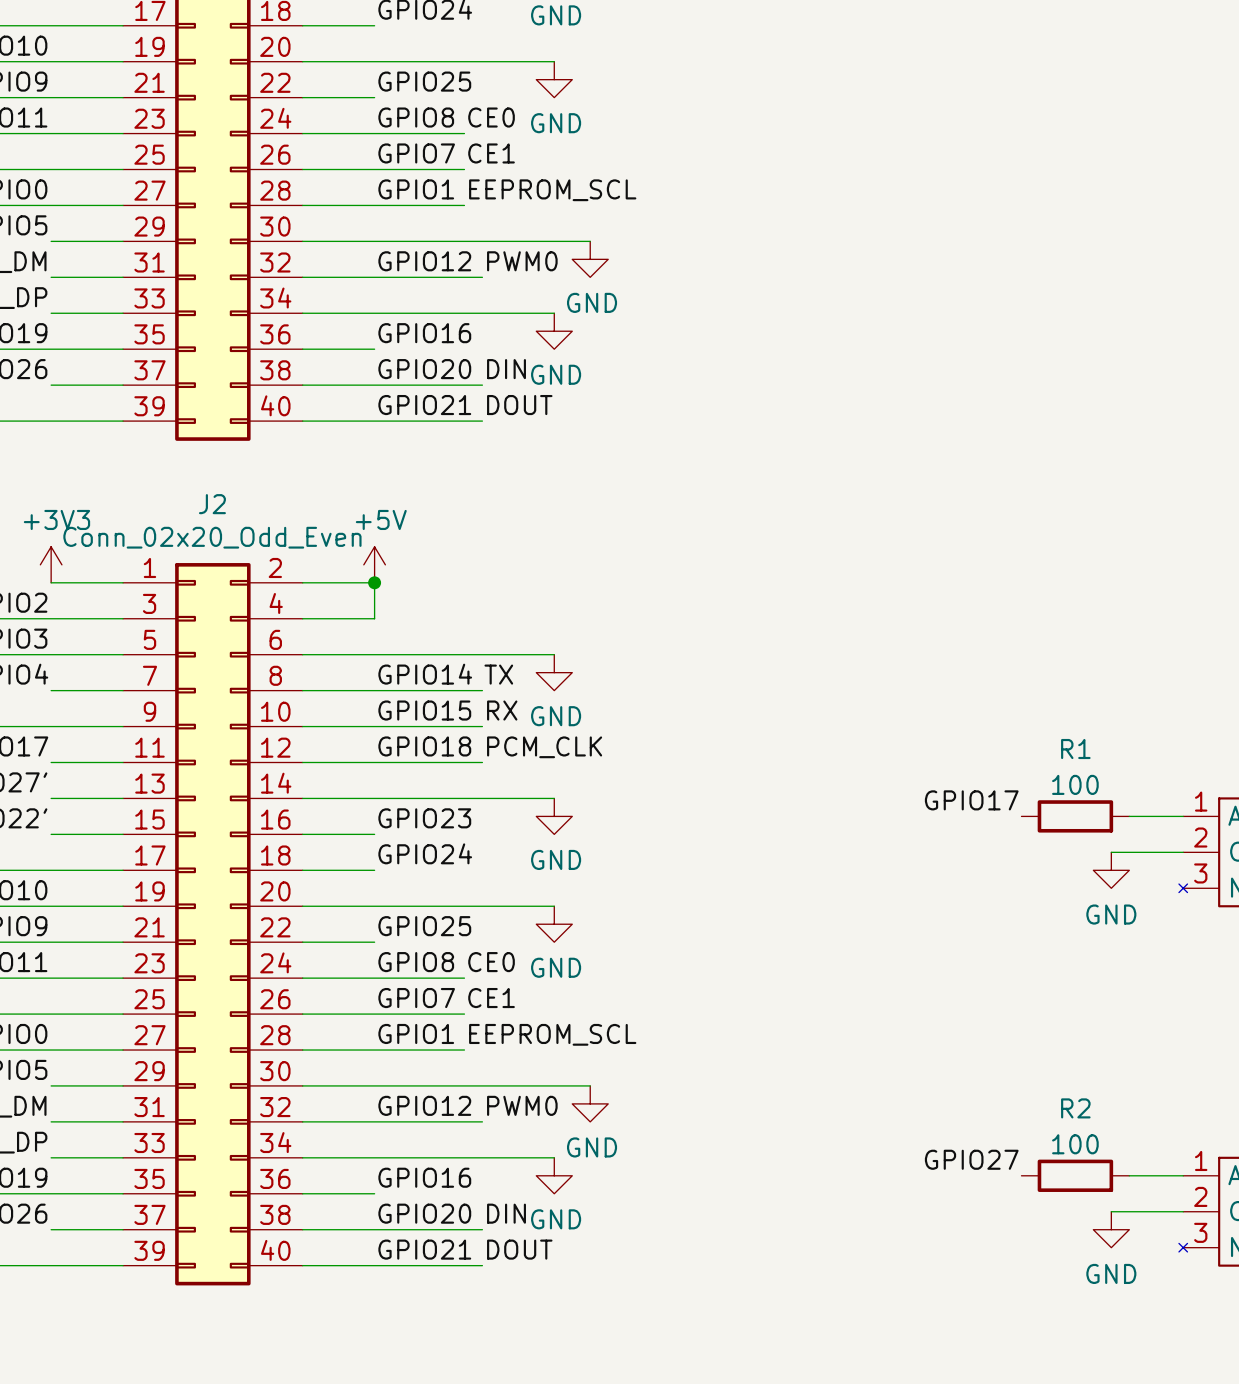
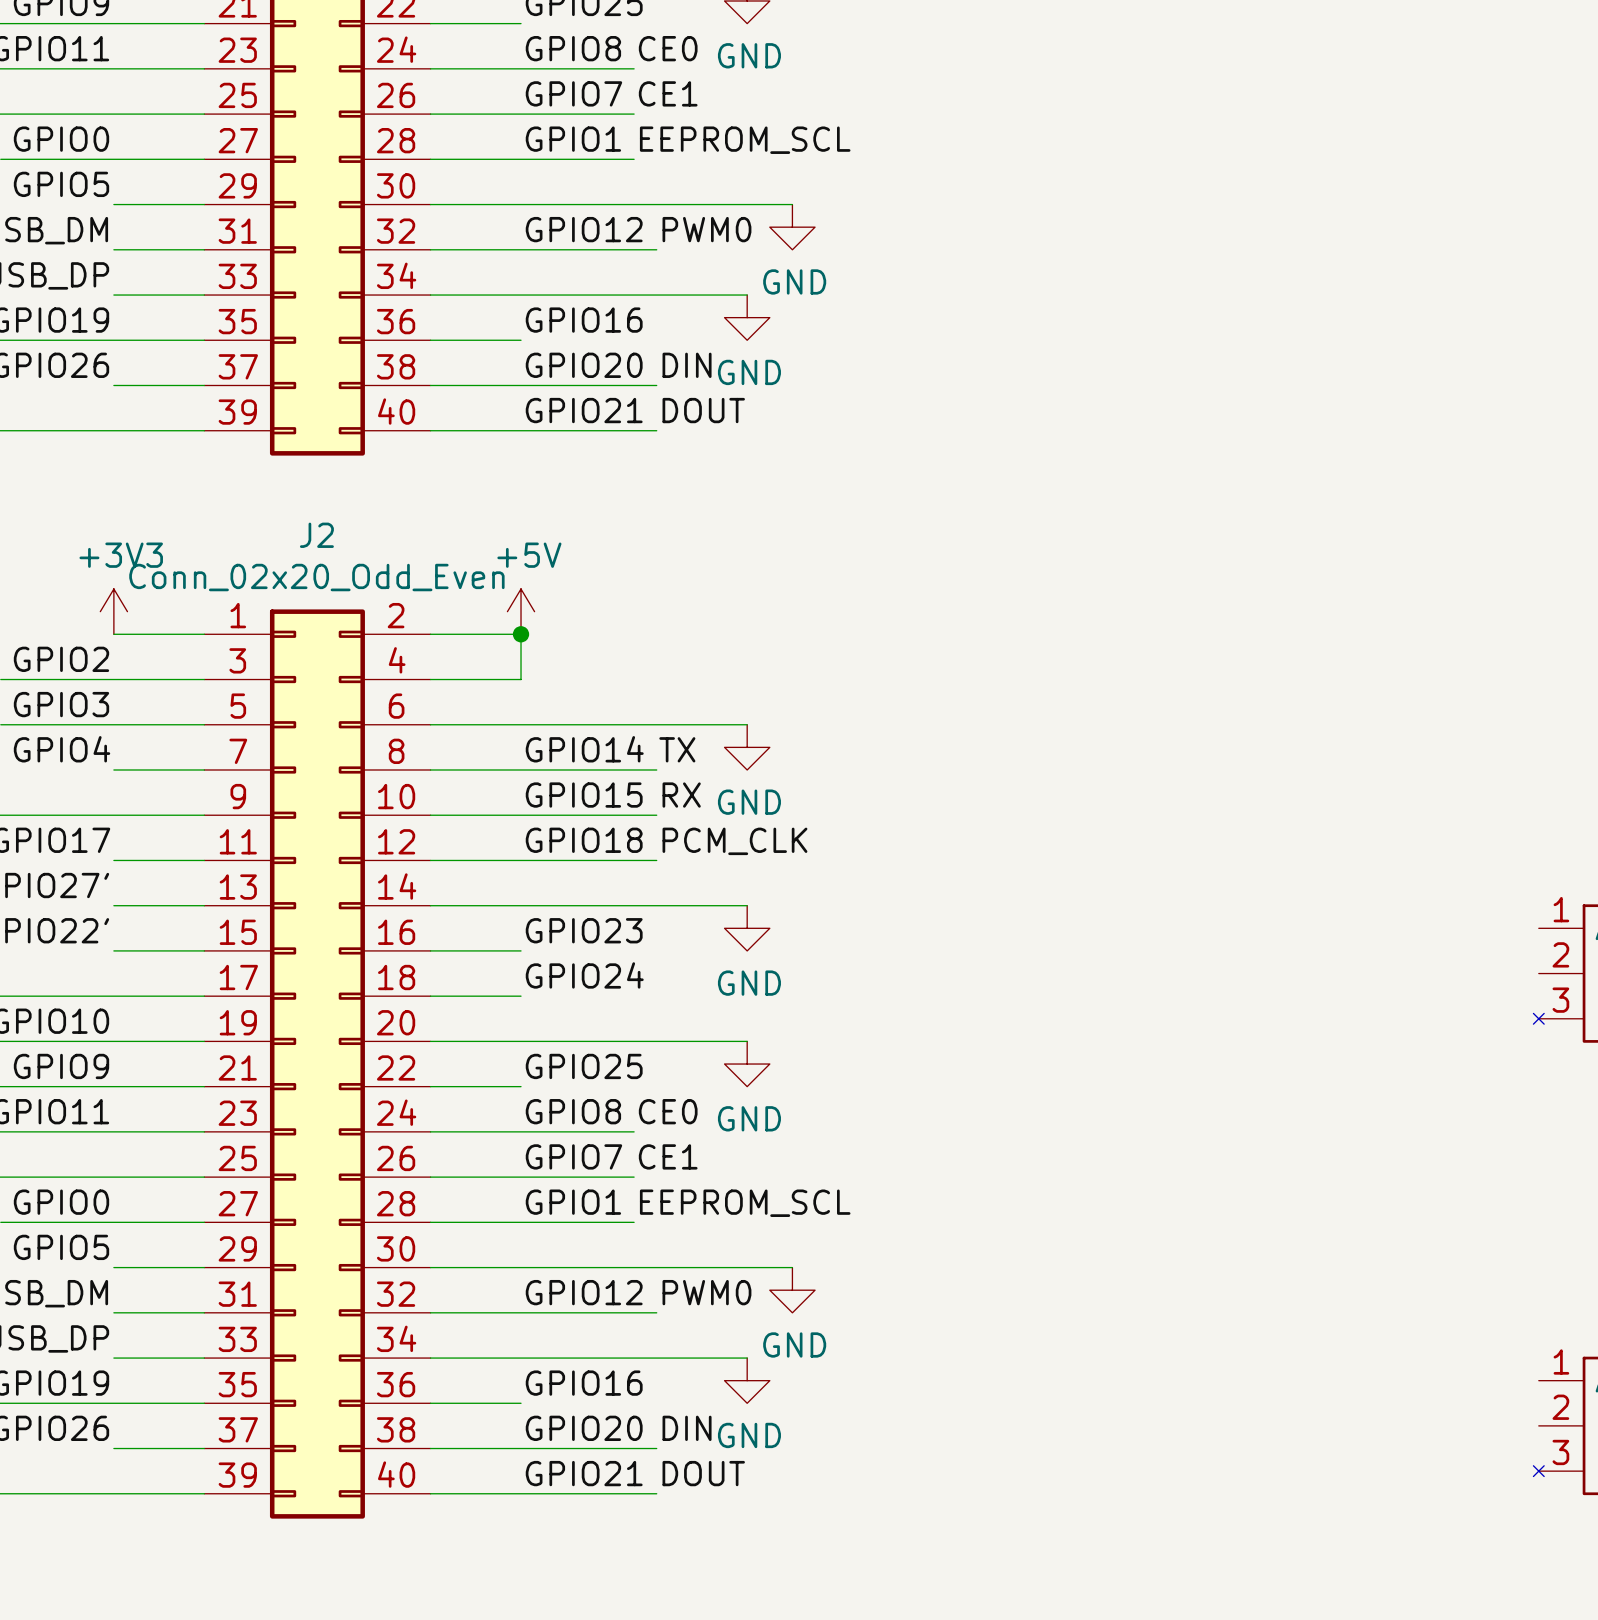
label: GPIO17 (971, 800) -> none
R1: 100 (1075, 816) -> none
wire: (1129, 816) (1183, 816) -> none
wire: (1111, 852) (1183, 852) -> none
power symbol: GND (1111, 870) -> none
label: GPIO27 (971, 1159) -> none
R2: 100 (1075, 1175) -> none
wire: (1129, 1175) (1183, 1175) -> none
wire: (1111, 1211) (1183, 1211) -> none
power symbol: GND (1111, 1229) -> none

